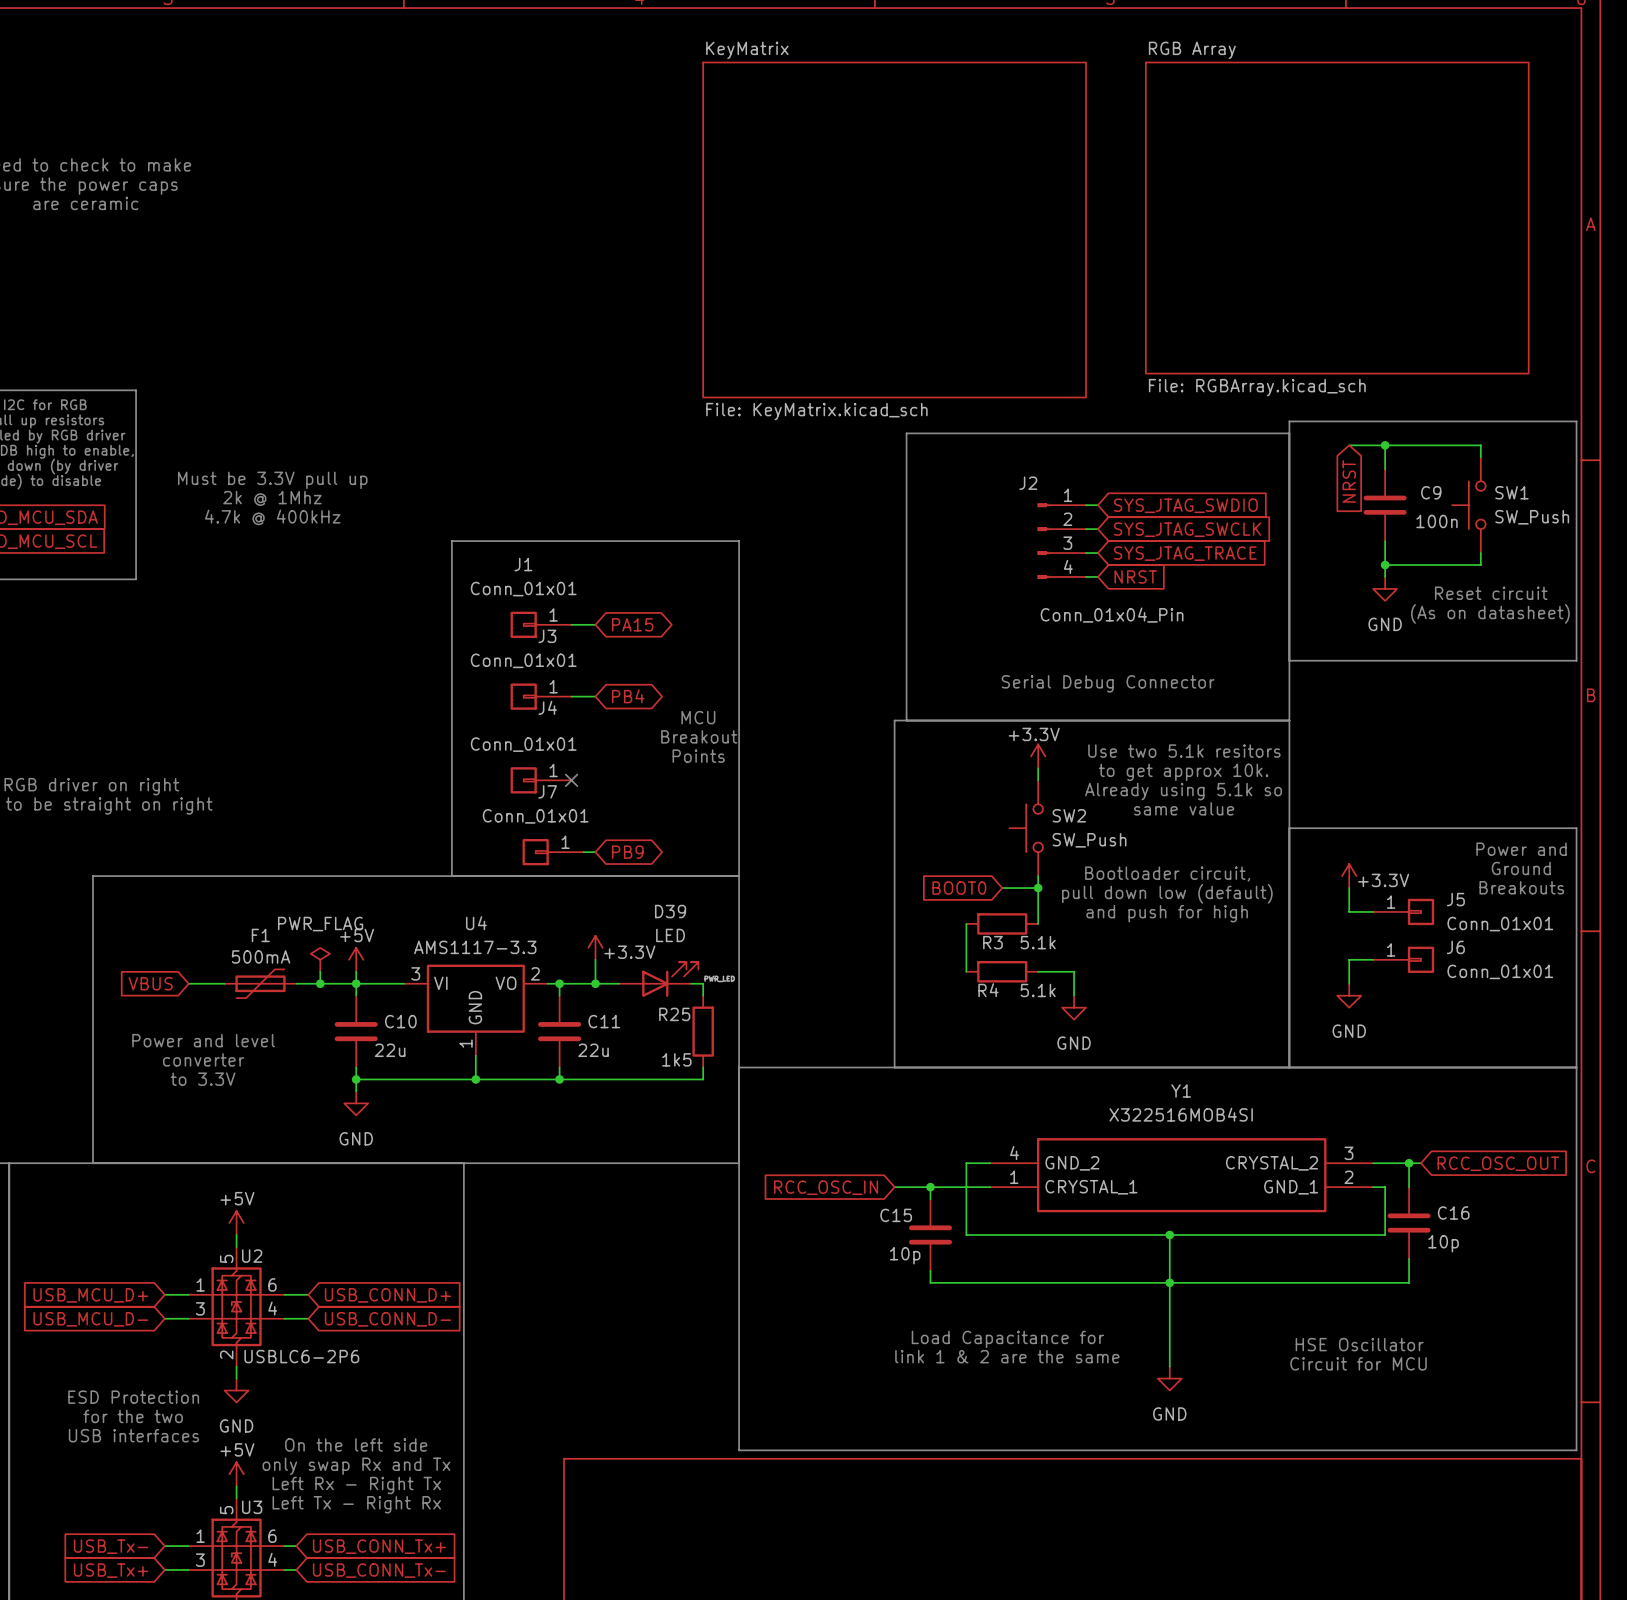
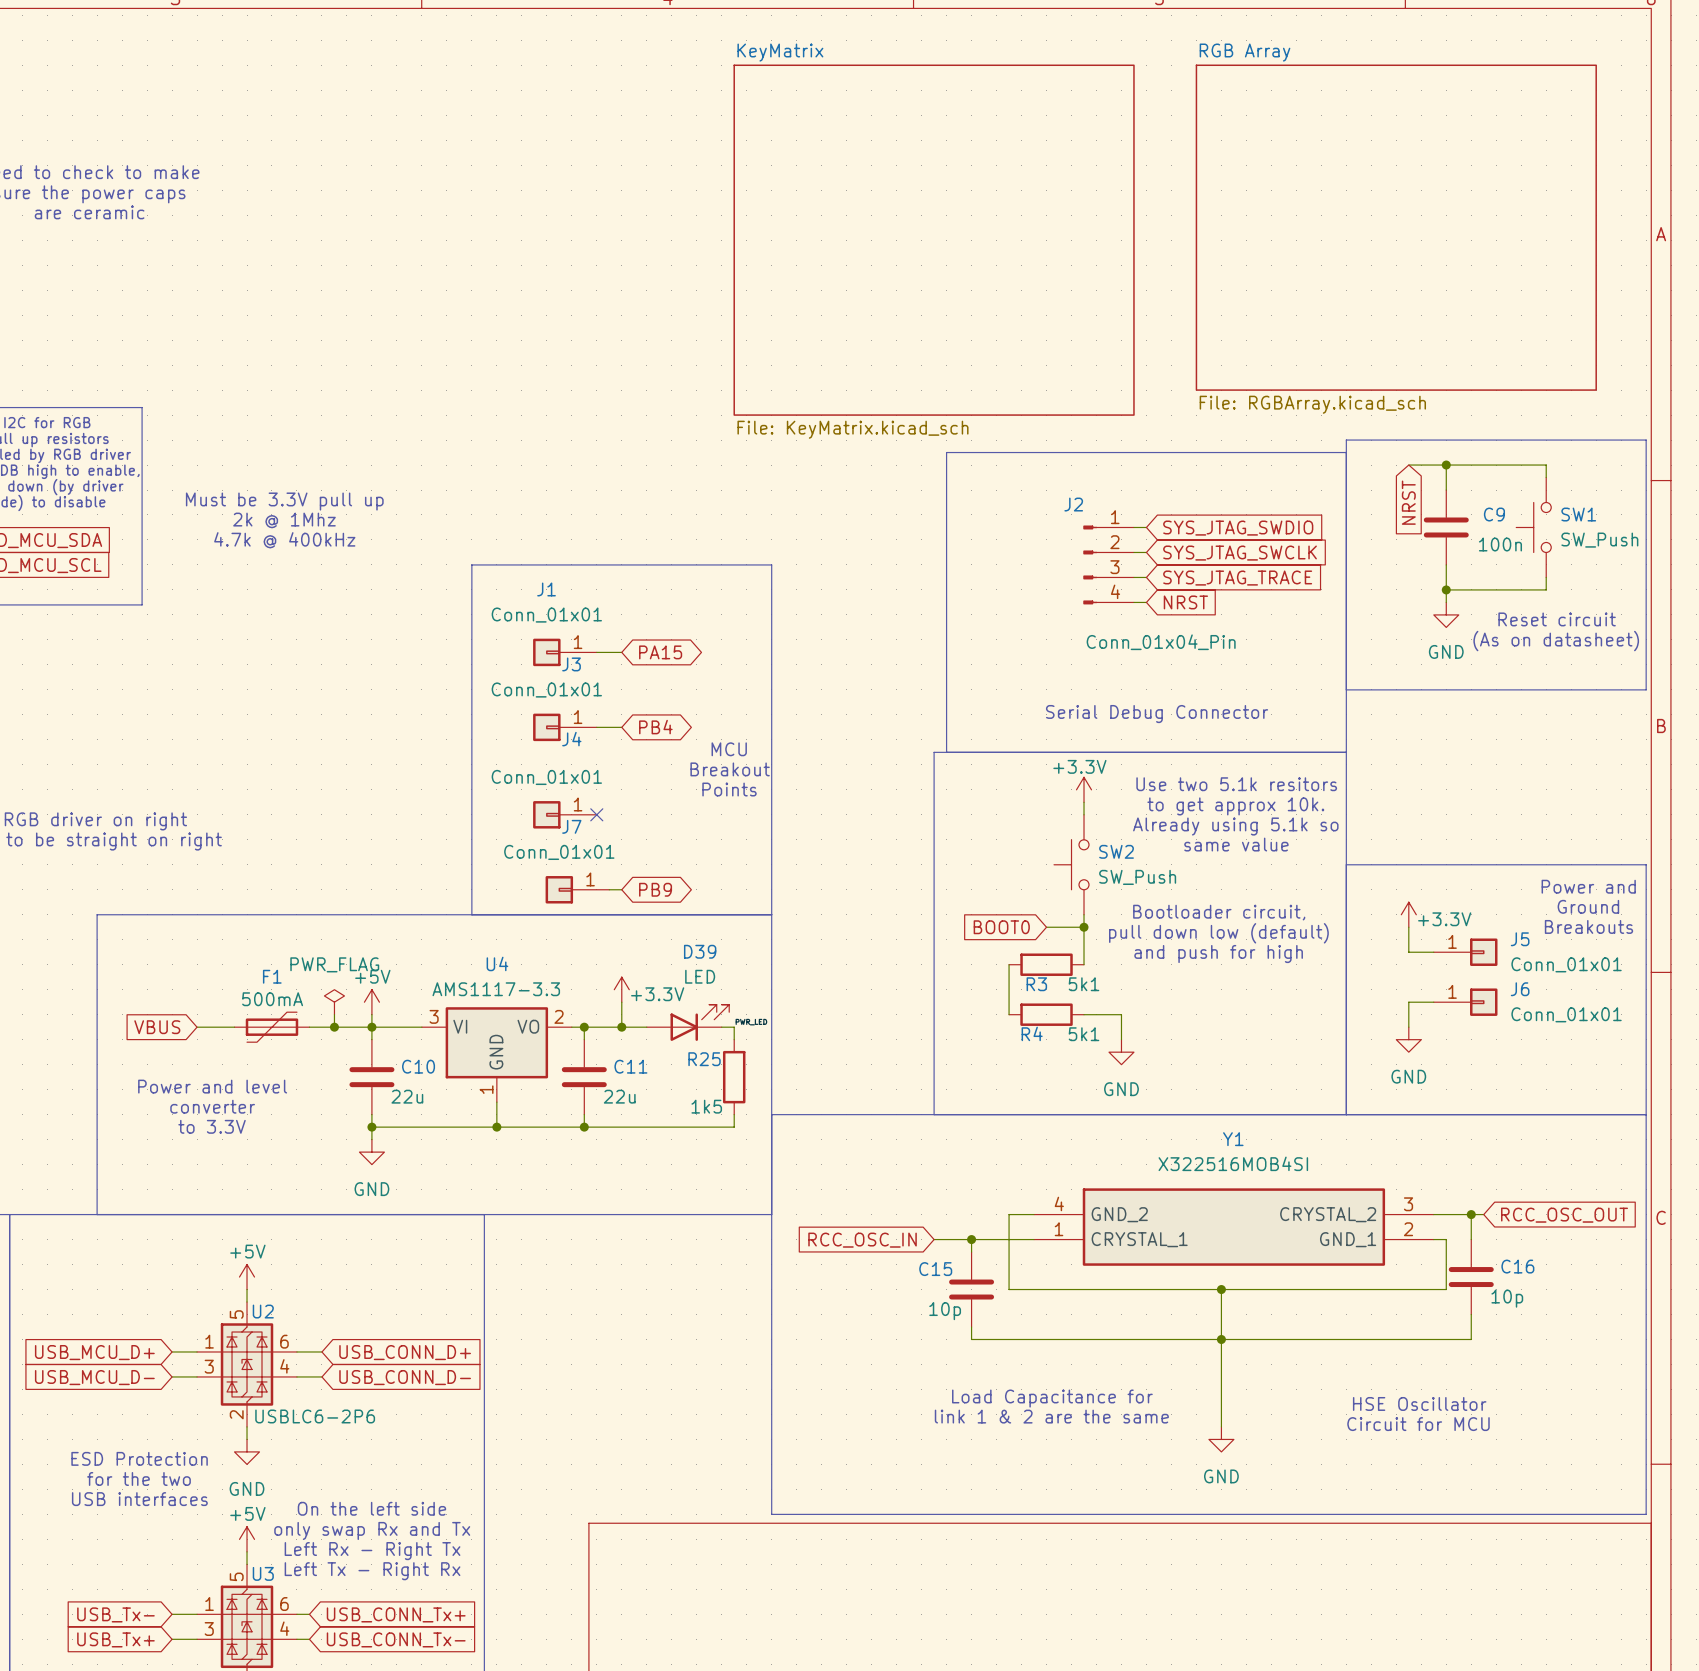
R3 value: 5.1k (1038, 942) -> 5k1 (1084, 984)
R4 value: 5.1k (1038, 990) -> 5k1 (1084, 1034)

